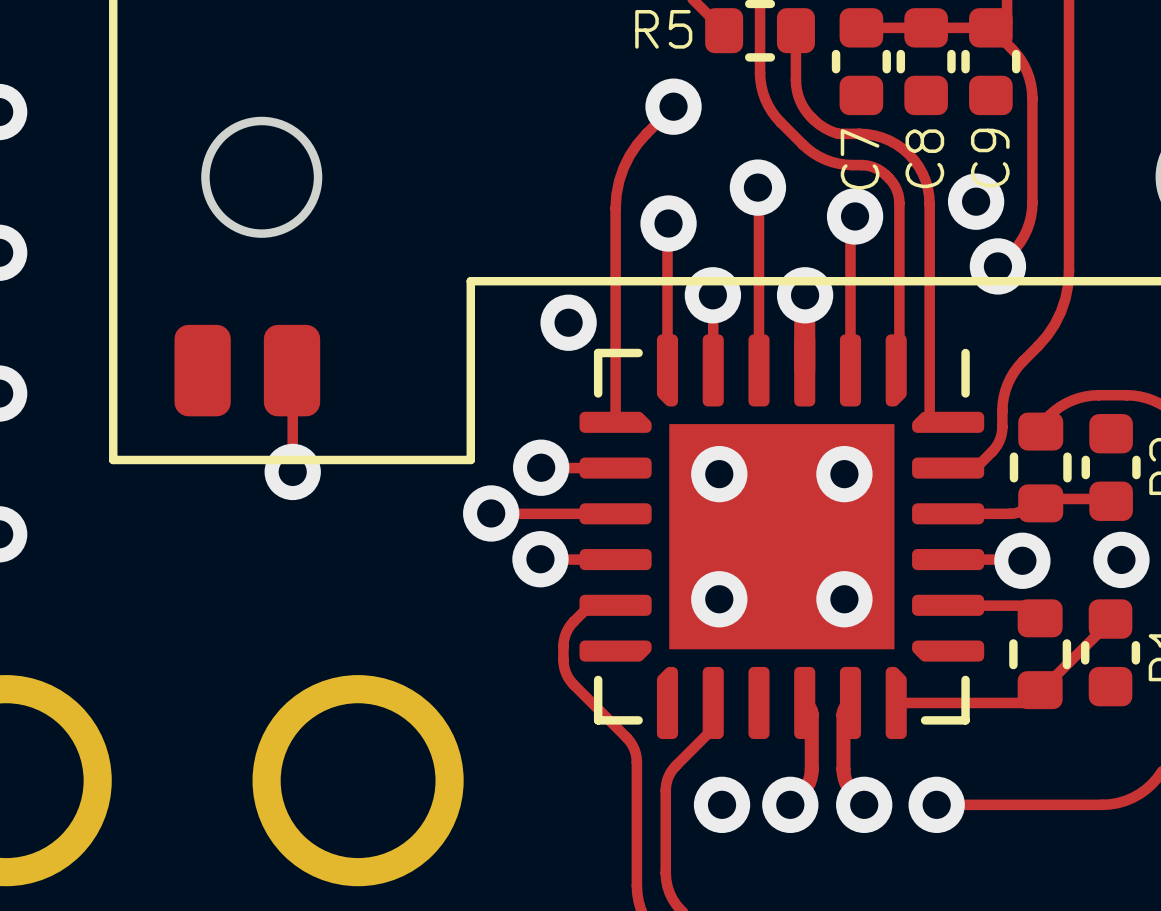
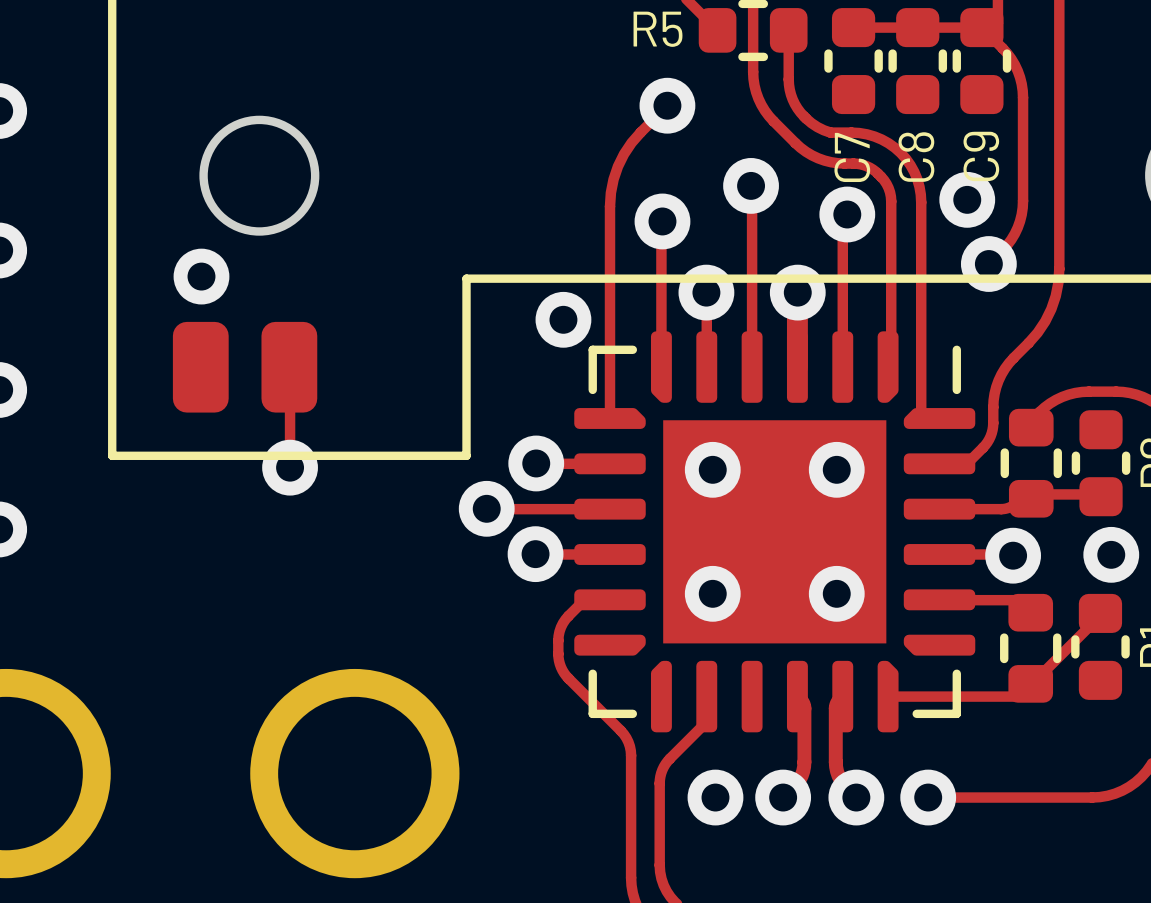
via: none -> (201, 276)

